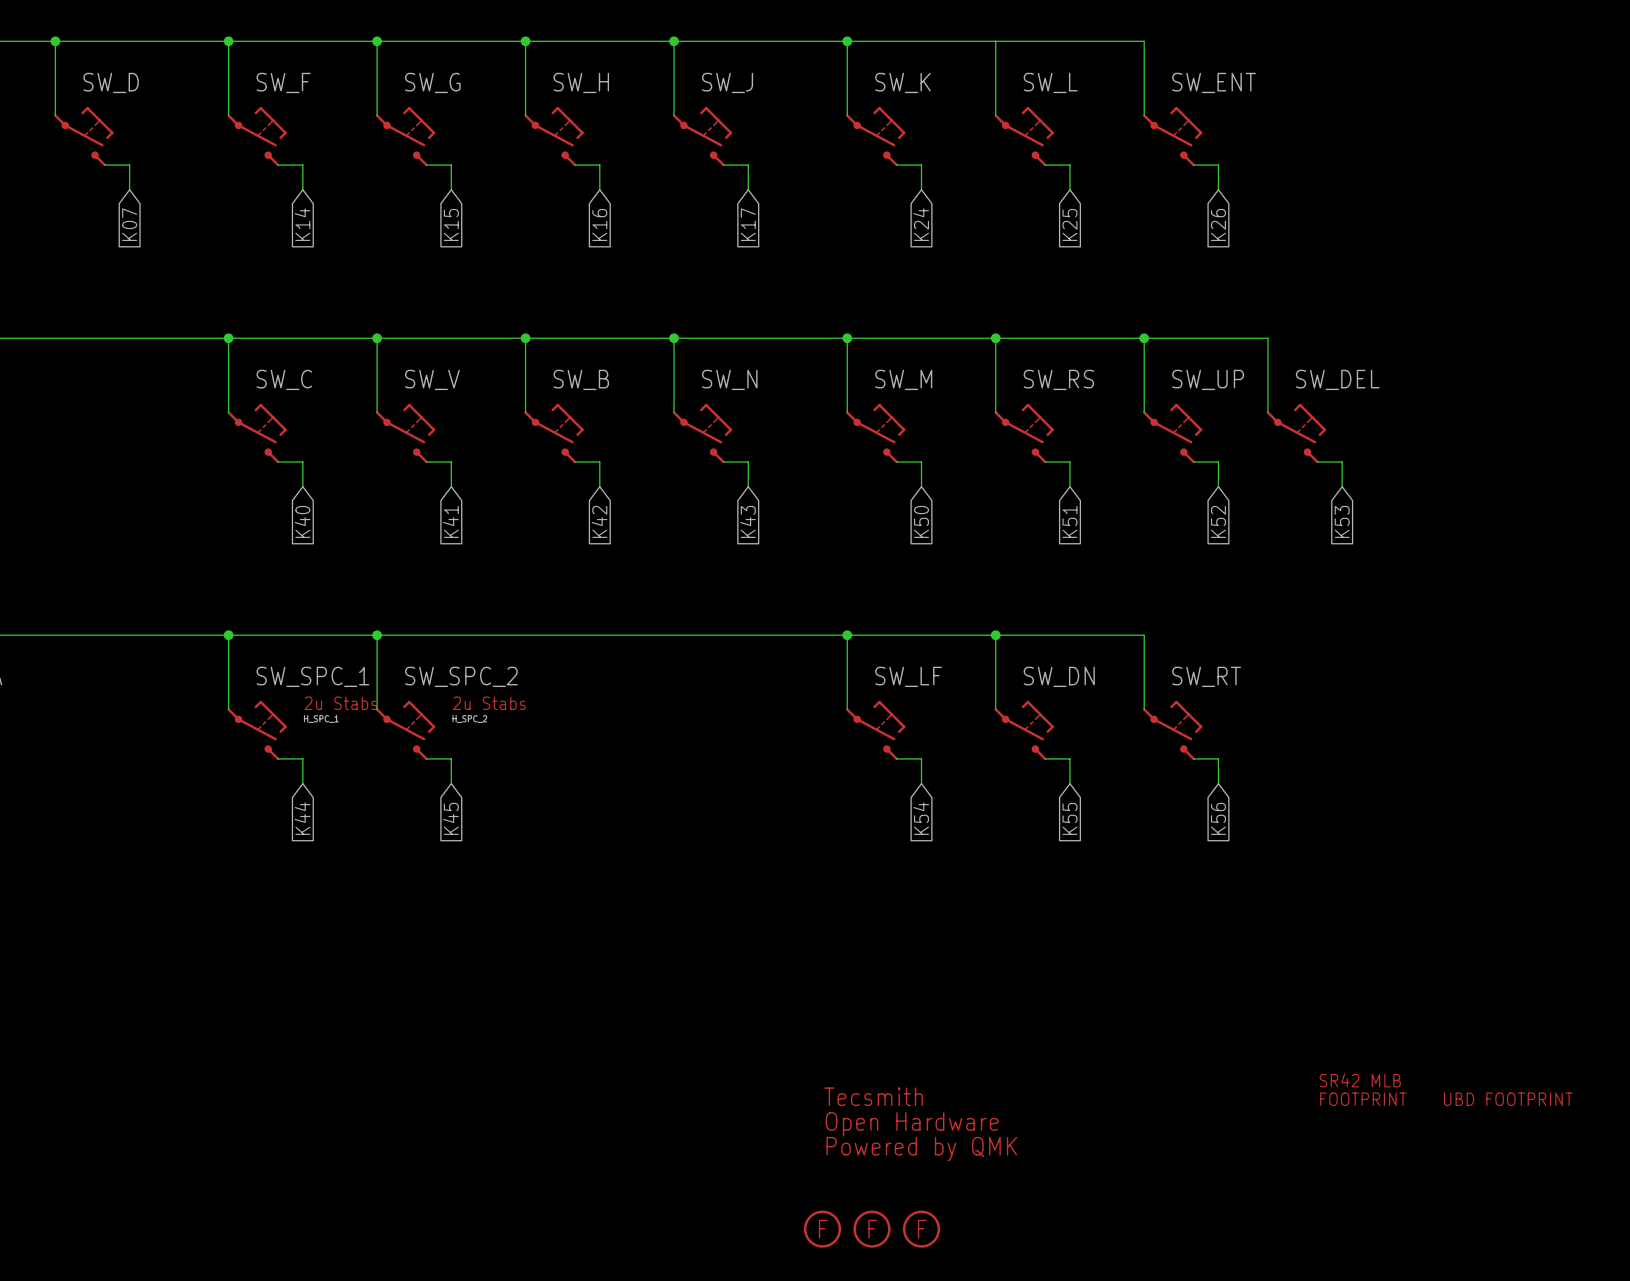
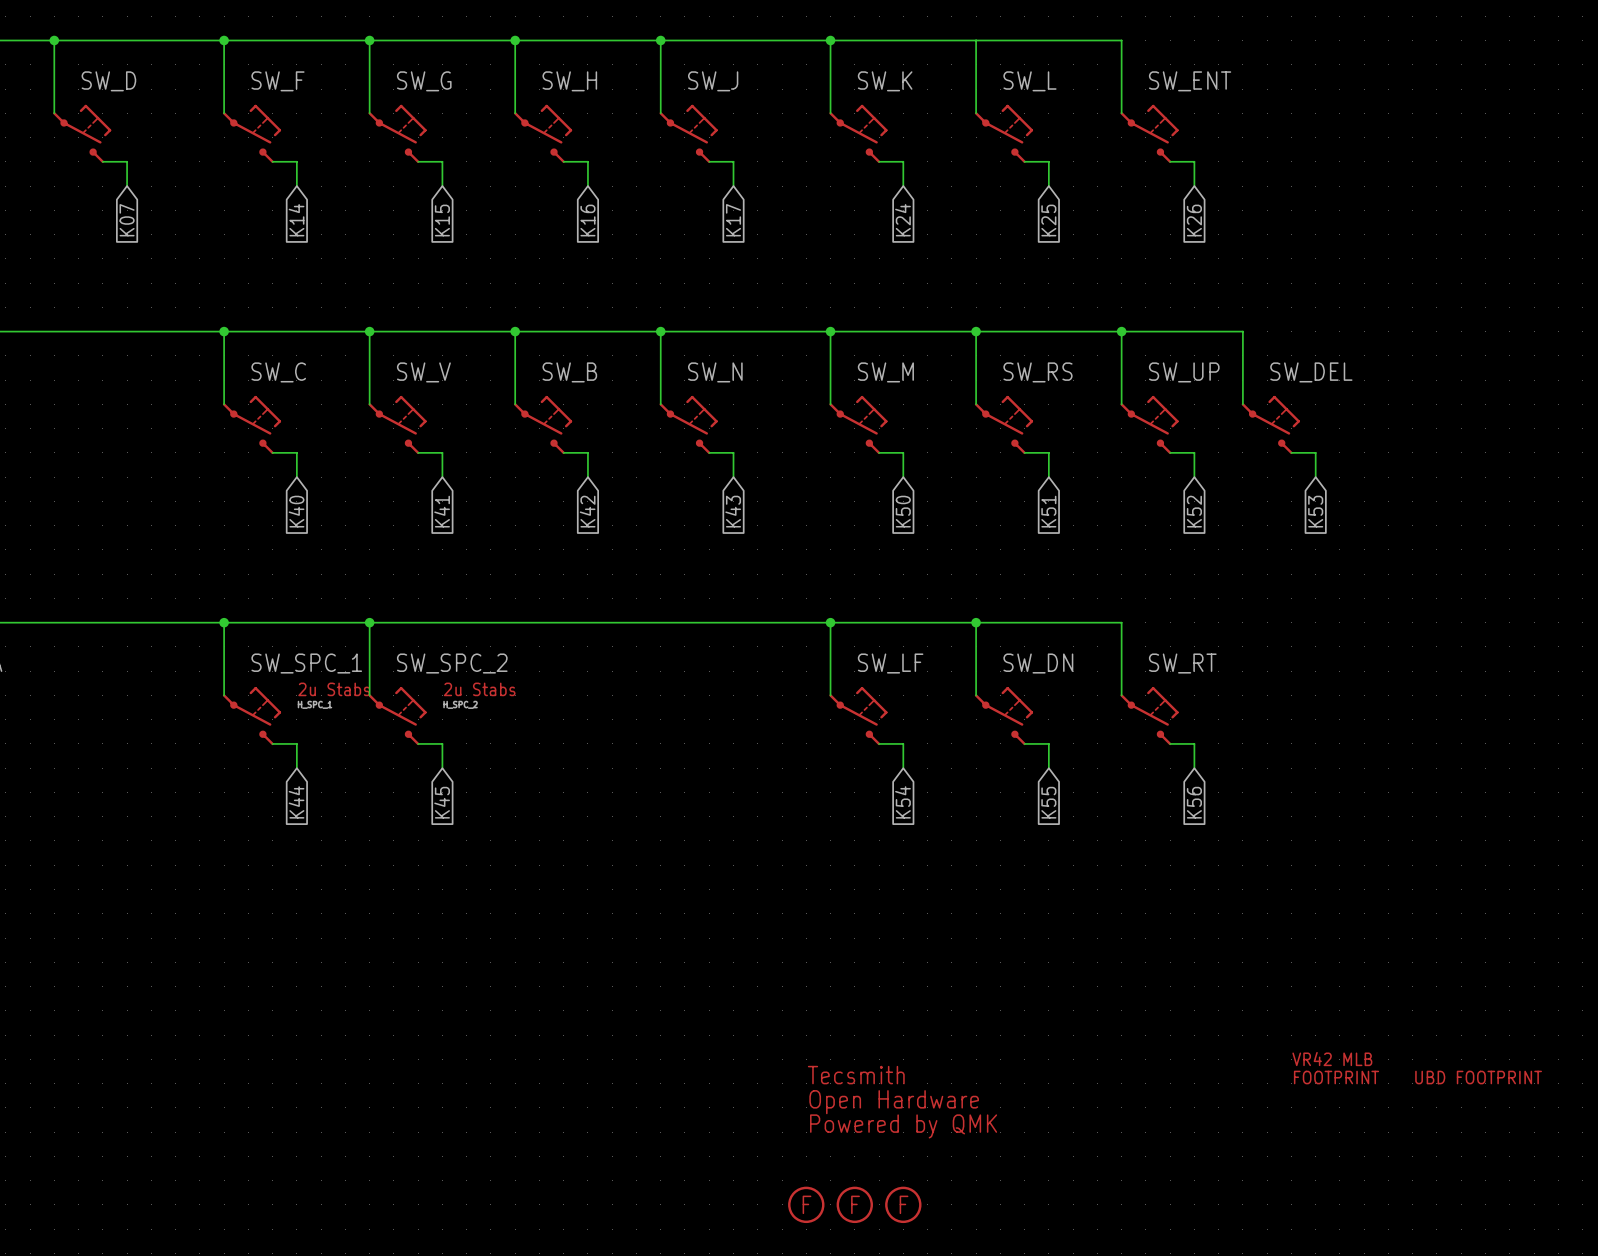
part text: SR42 MLB (1360, 1080) -> VR42 MLB (1332, 1059)

